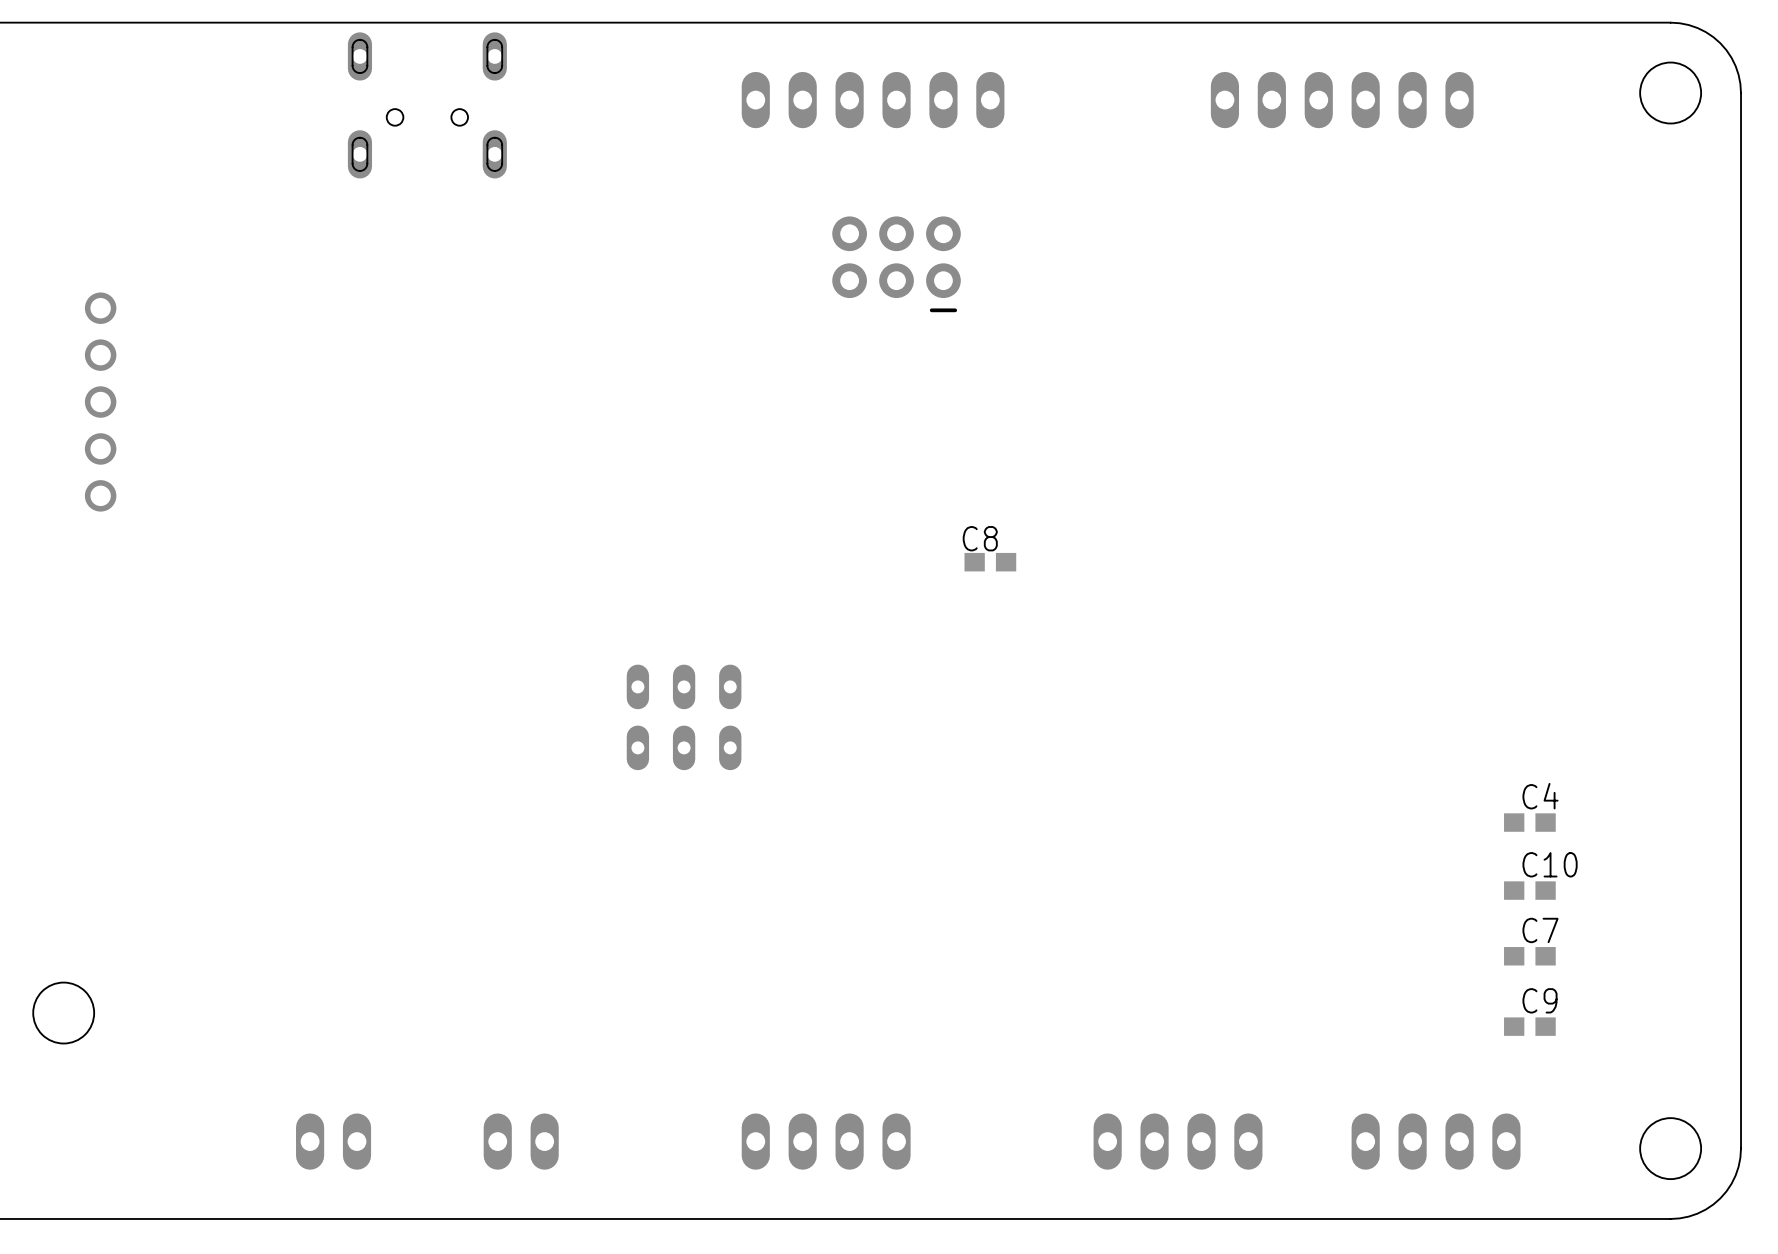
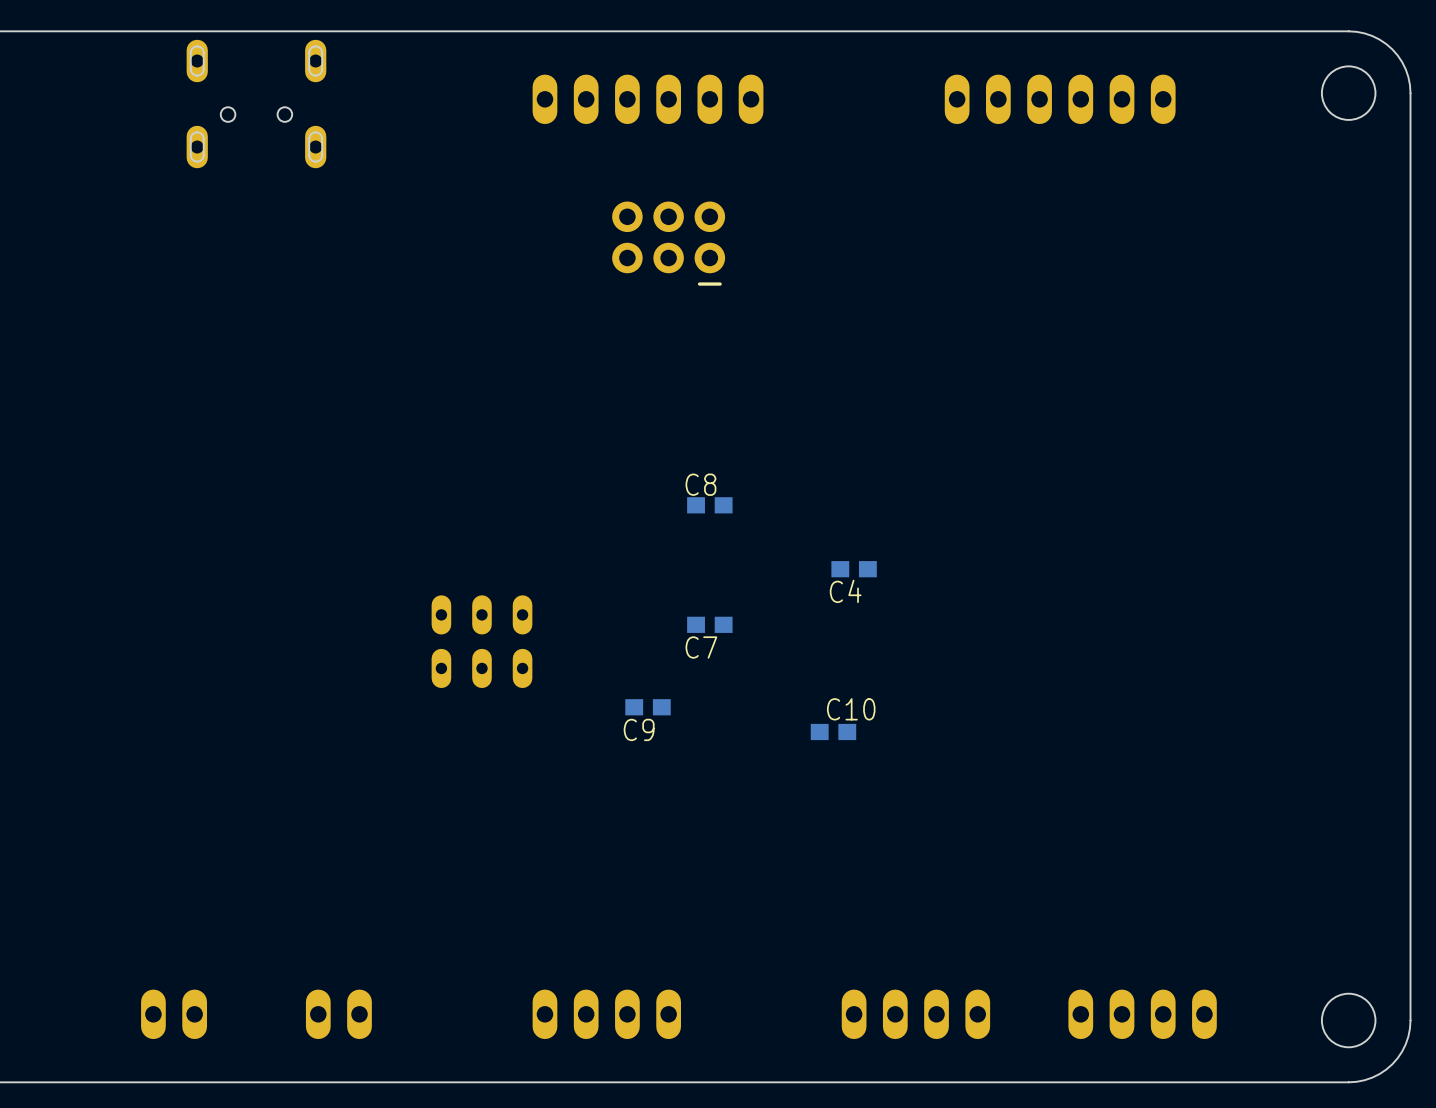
C8 position: (990, 562) -> (709, 505)
C4 name position: C4 (1540, 796) -> C4 (845, 591)
C4 position: (1529, 822) -> (854, 569)
C10 position: (1529, 890) -> (833, 731)
C7 name position: C7 (1540, 930) -> C7 (701, 647)
C7 position: (1529, 956) -> (709, 624)
C9 name position: C9 (1540, 1000) -> C9 (639, 729)
C9 position: (1529, 1026) -> (648, 707)

